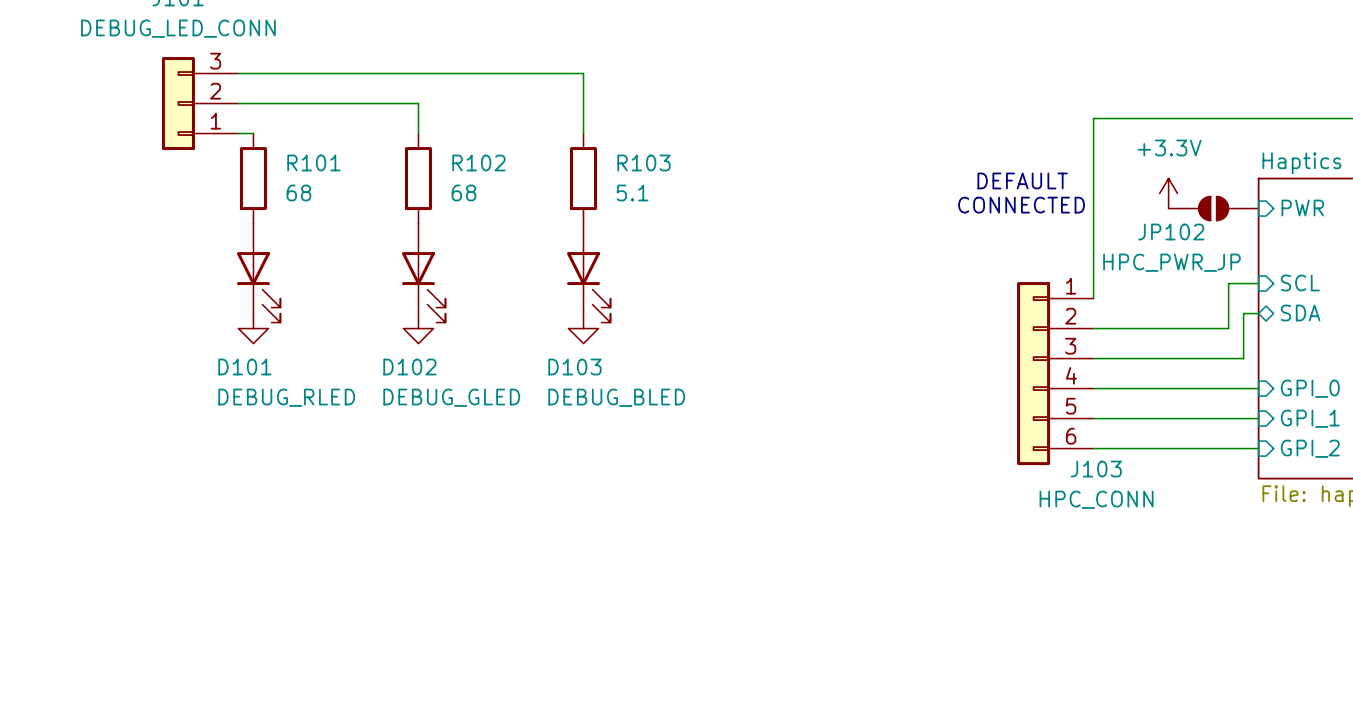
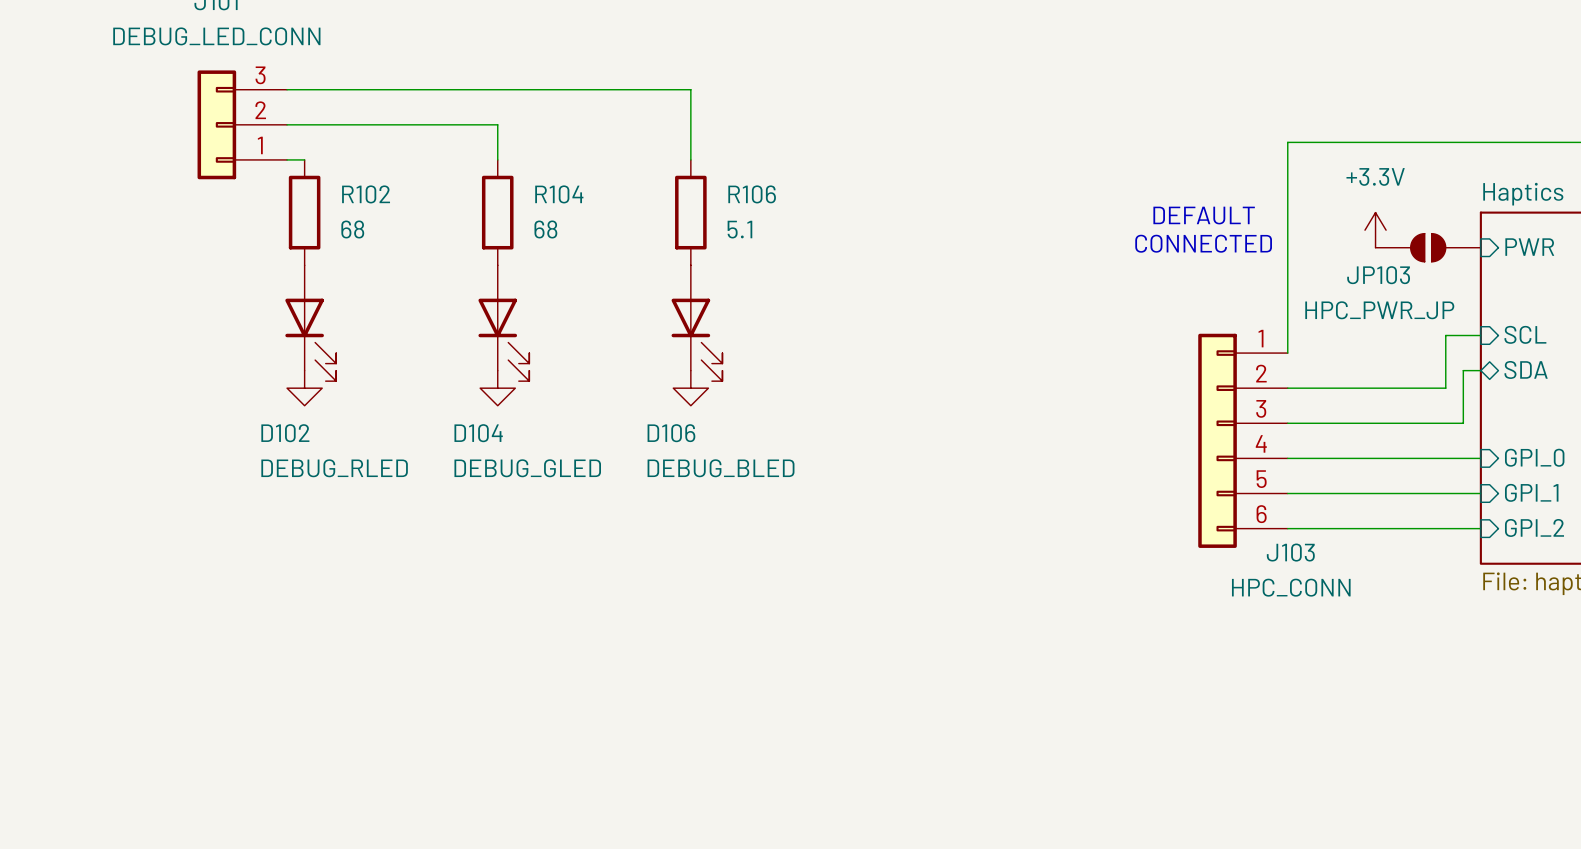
R101 name: R101 (313, 162) -> R102 (366, 194)
R102 name: R102 (478, 162) -> R104 (559, 194)
R103 name: R103 (643, 162) -> R106 (752, 194)
JP102 name: JP102 (1171, 231) -> JP103 (1378, 275)
D101 name: D101 (244, 367) -> D102 (285, 433)
D102 name: D102 (409, 367) -> D104 (478, 433)
D103 name: D103 (574, 367) -> D106 (671, 433)

